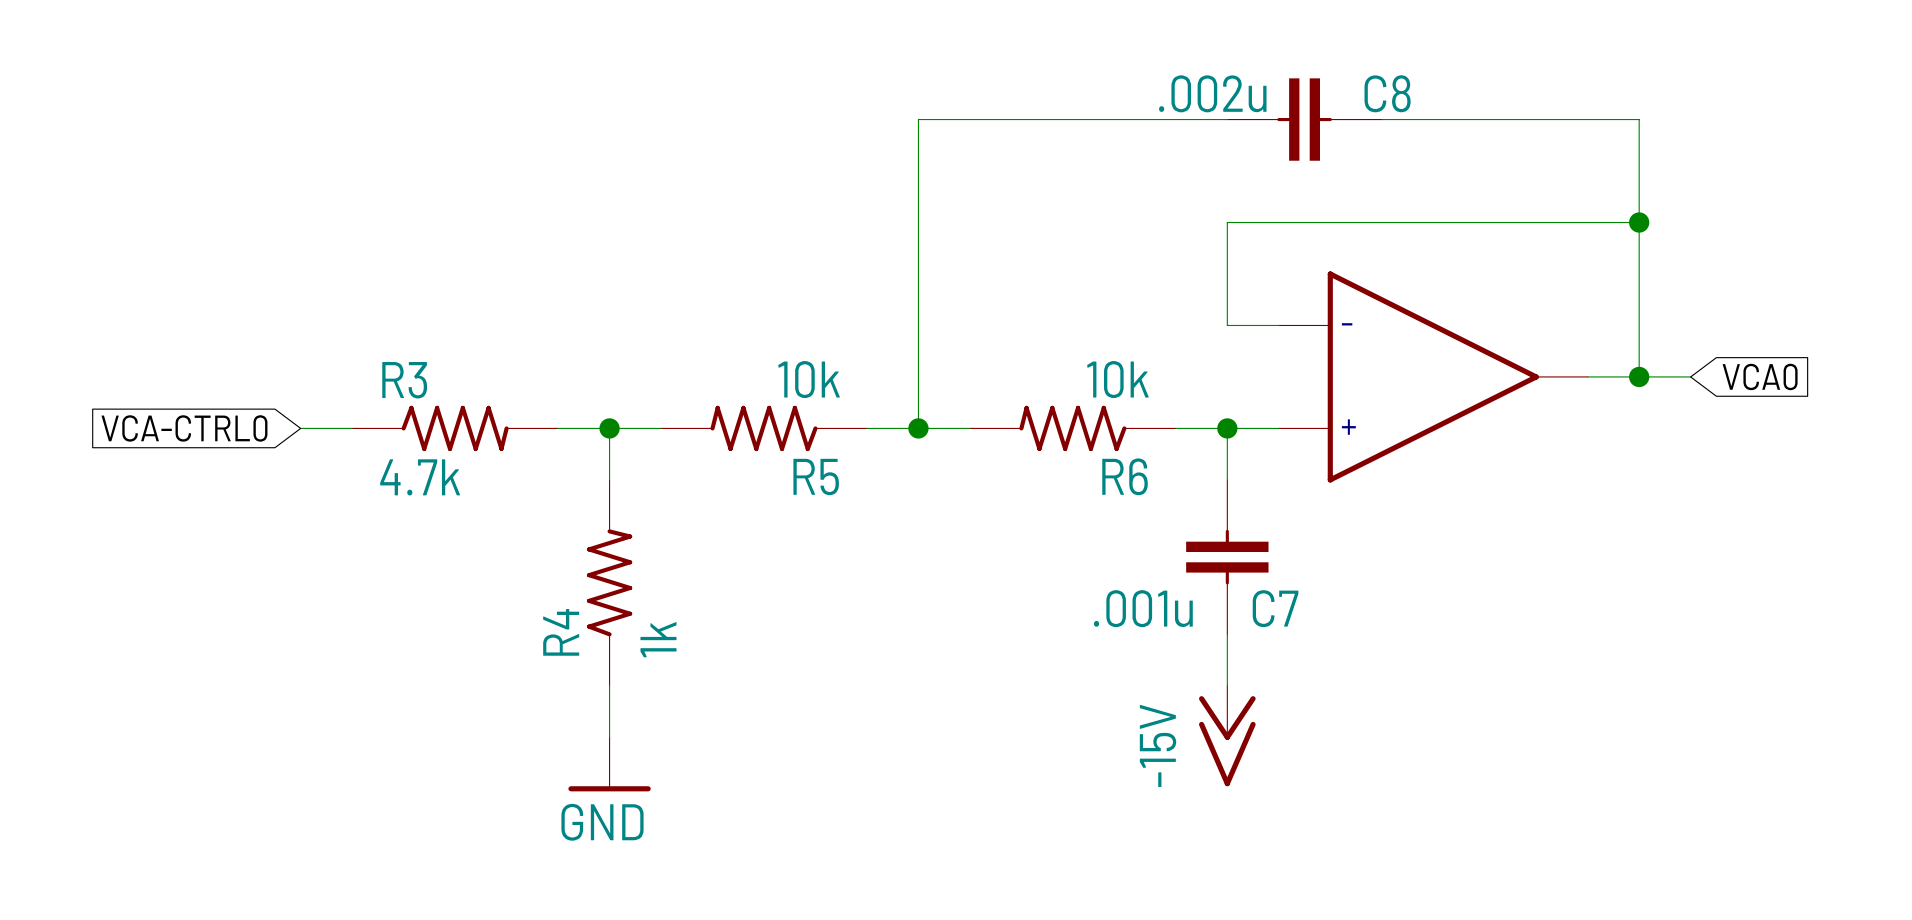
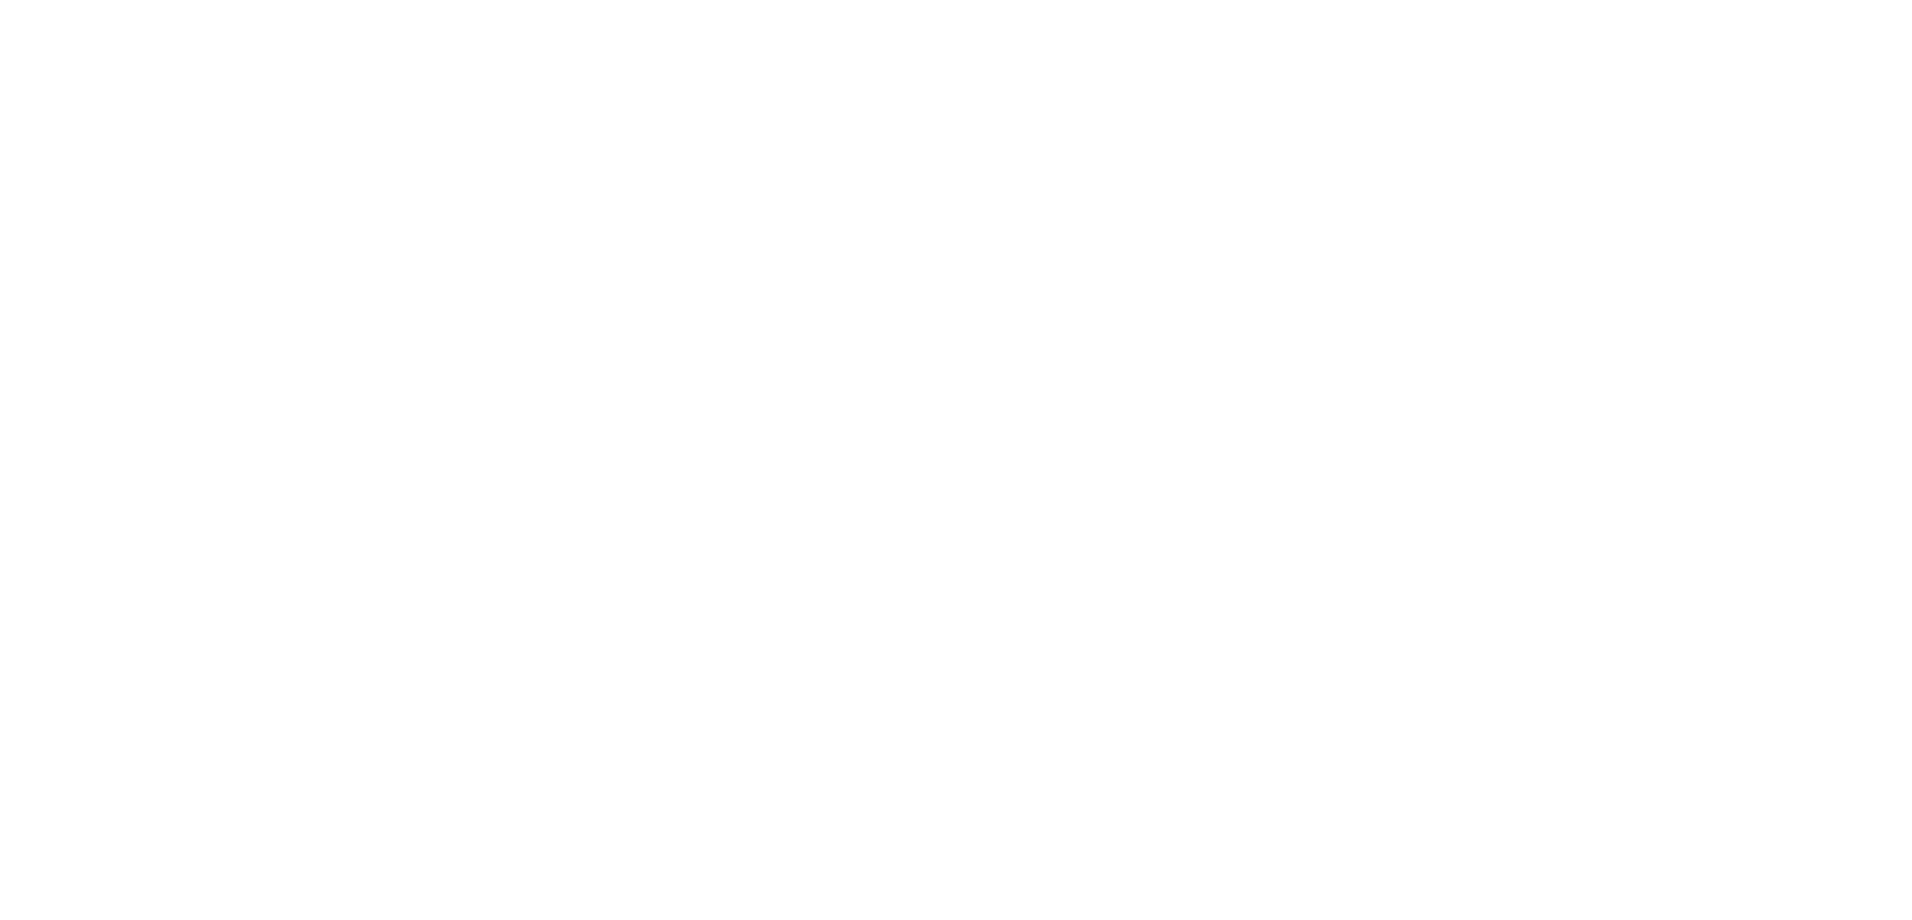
wire: (1227, 119) (918, 119) (918, 428) -> none
C8: .002u (1304, 119) -> none
wire: (1381, 119) (1639, 119) (1639, 376) -> none
wire: (1639, 222) (1227, 222) (1227, 325) (1278, 325) -> none
junction: (1639, 222) -> none
part: (1433, 376) -> none
wire: (1587, 376) (1690, 376) -> none
junction: (1639, 376) -> none
global label: VCA0 (1760, 376) -> none
global label: VCA-CTRL0 (184, 428) -> none
wire: (300, 428) (352, 428) -> none
R3: 4.7k (455, 428) -> none
wire: (558, 428) (661, 428) -> none
wire: (609, 428) (609, 479) -> none
junction: (609, 428) -> none
R5: 10k (764, 428) -> none
wire: (866, 428) (969, 428) -> none
junction: (918, 428) -> none
R6: 10k (1072, 428) -> none
wire: (1175, 428) (1278, 428) -> none
wire: (1227, 428) (1227, 479) -> none
junction: (1227, 428) -> none
C7: .001u (1227, 557) -> none
R4: 1k (609, 582) -> none
wire: (1227, 634) (1227, 685) -> none
wire: (609, 685) (609, 737) -> none
power symbol: -15V (1227, 736) -> none
power symbol: GND (609, 764) -> none

